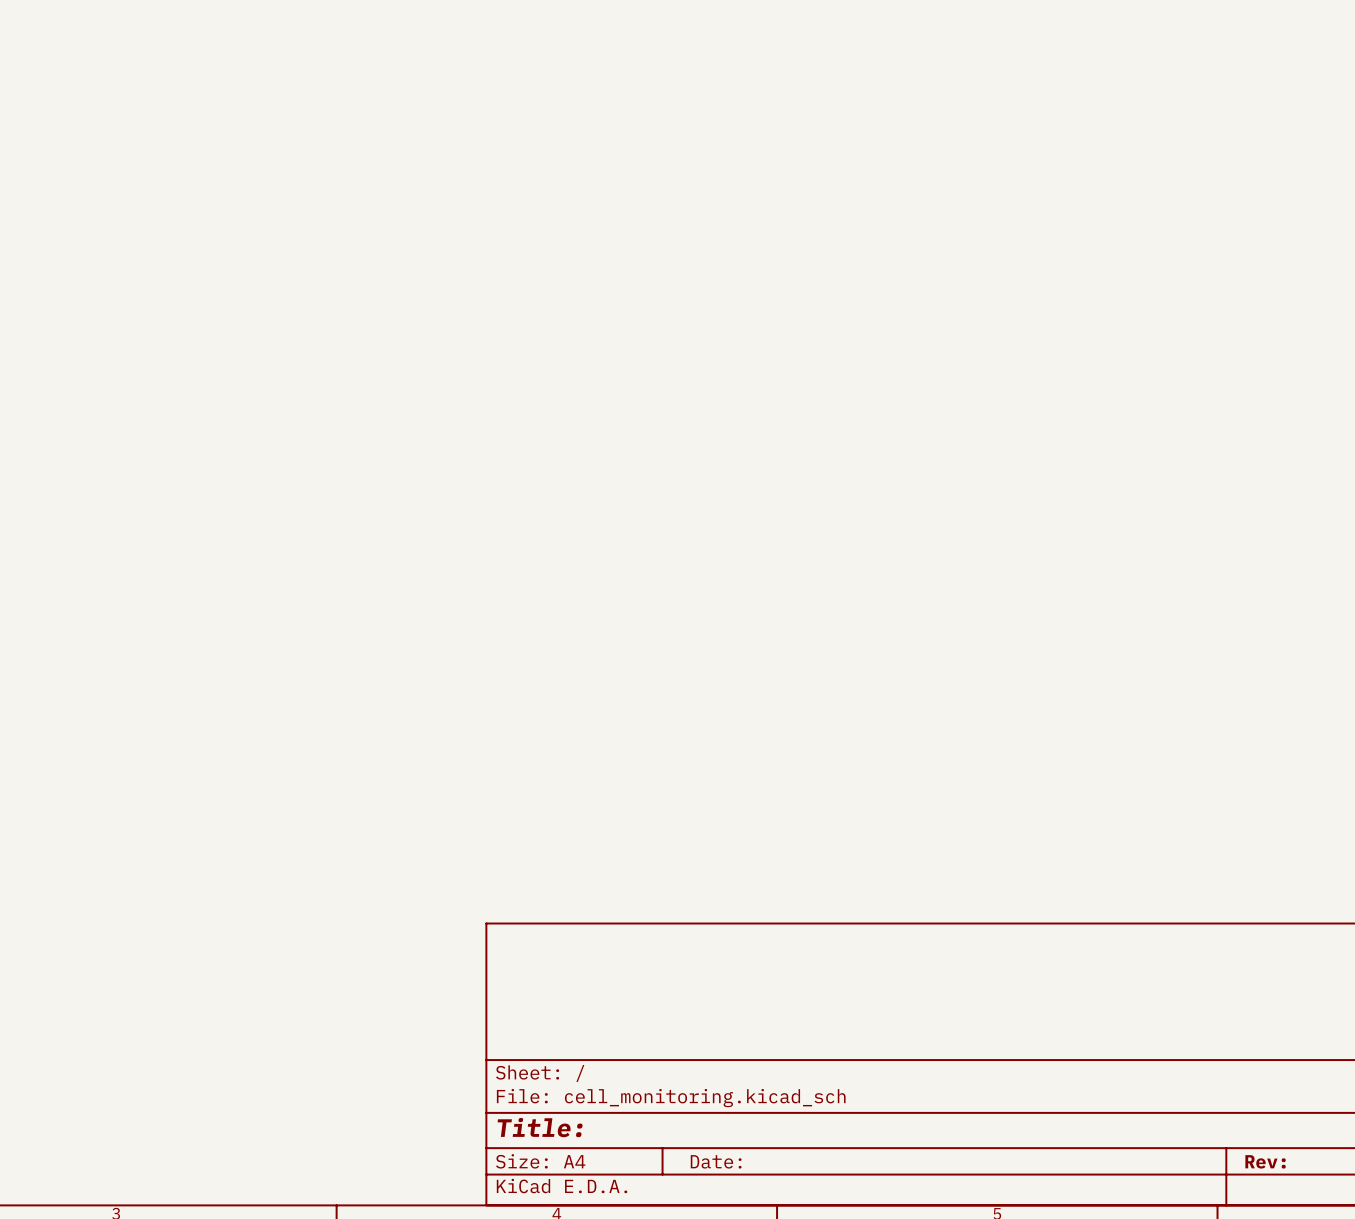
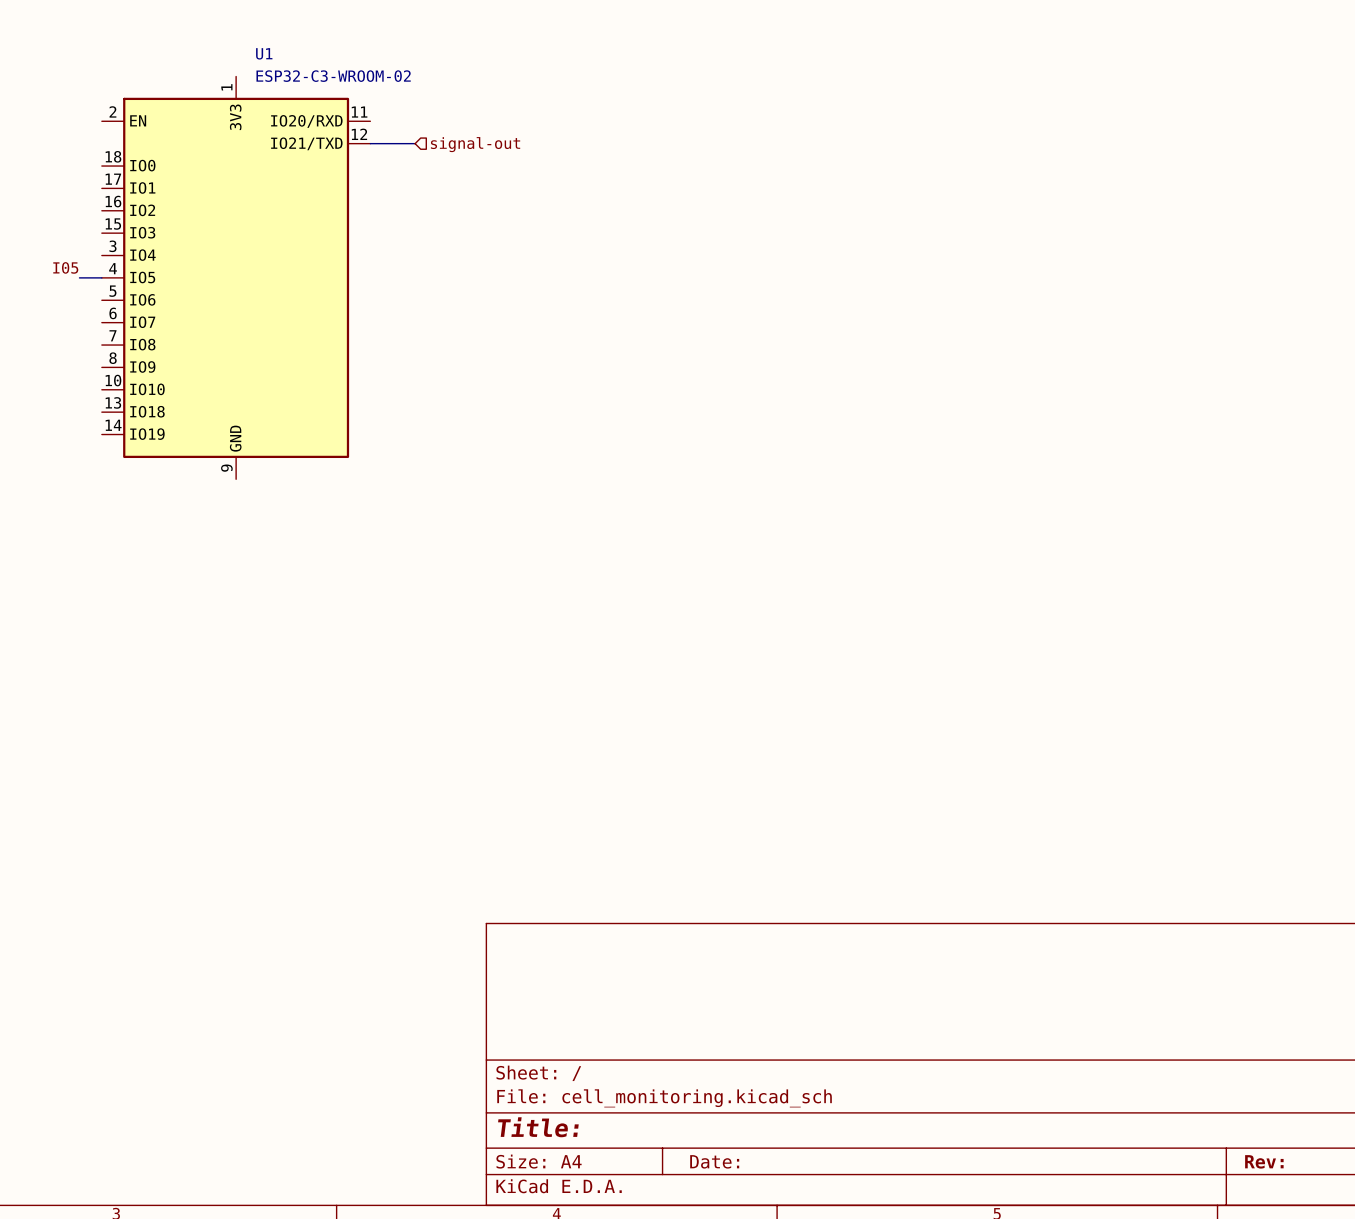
wire: none -> (370, 143) (415, 143)
hierarchical label: none -> signal-out (475, 144)
label: none -> I05 (65, 267)
wire: none -> (79, 277) (101, 277)
U1: none -> ESP32-C3-WROOM-02 (236, 277)

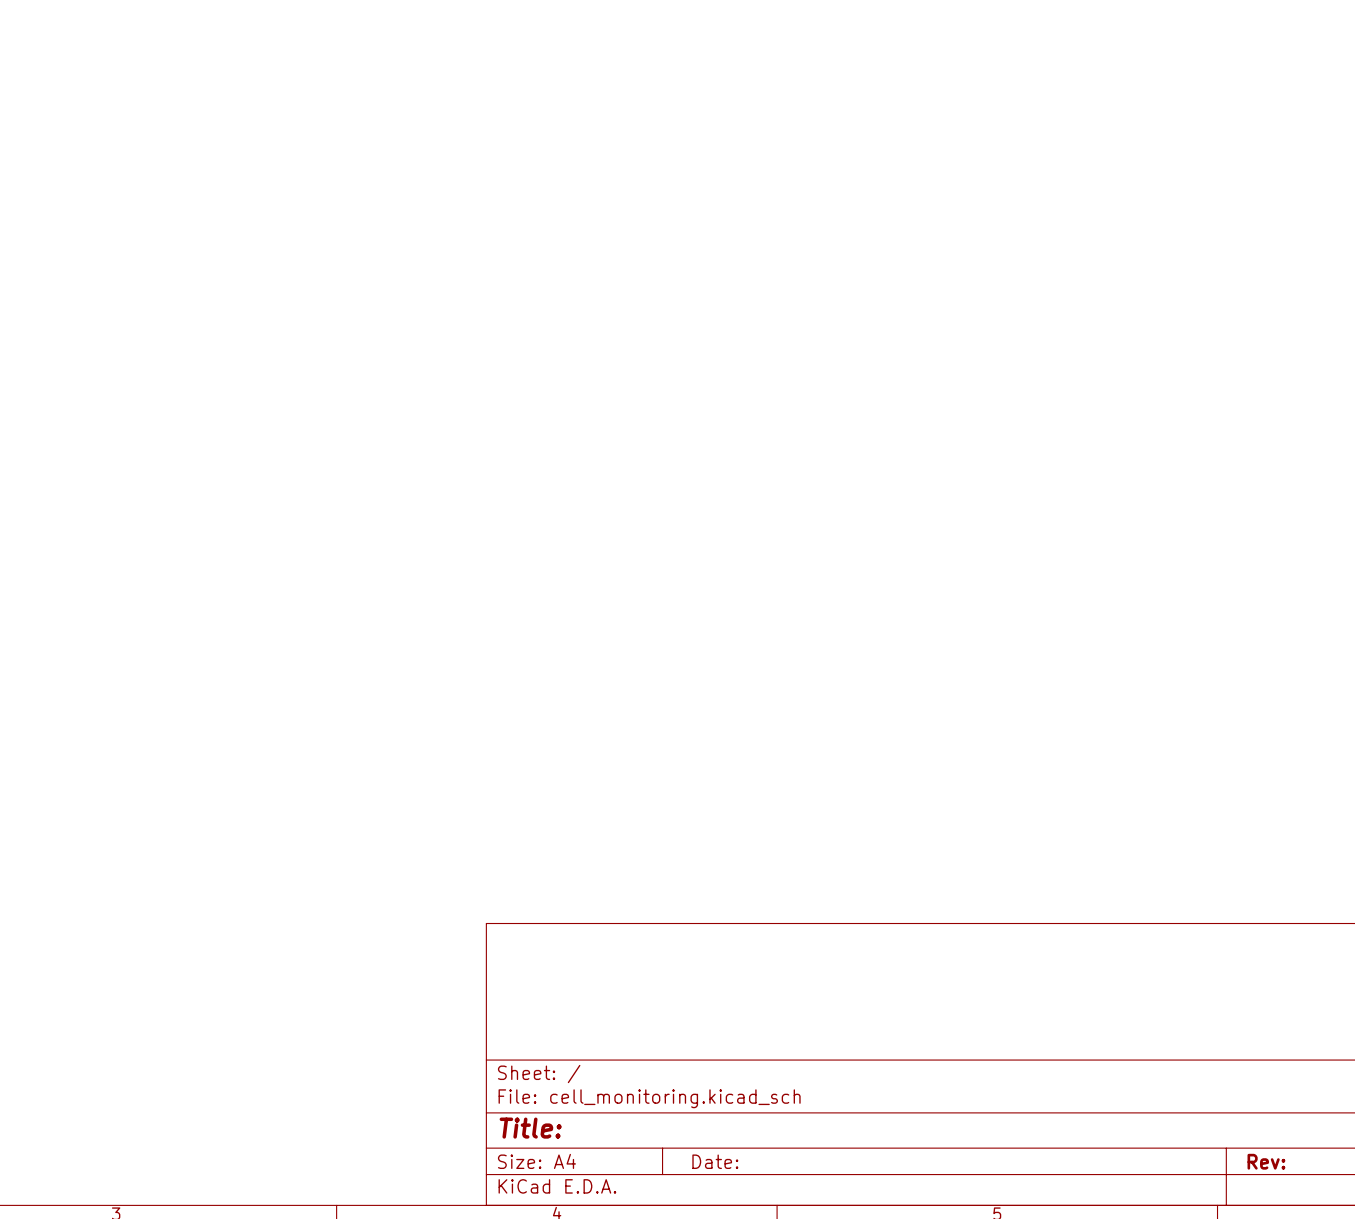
wire: (370, 143) (415, 143) -> none
hierarchical label: signal-out (475, 144) -> none
label: I05 (65, 267) -> none
wire: (79, 277) (101, 277) -> none
U1: ESP32-C3-WROOM-02 (236, 277) -> none

